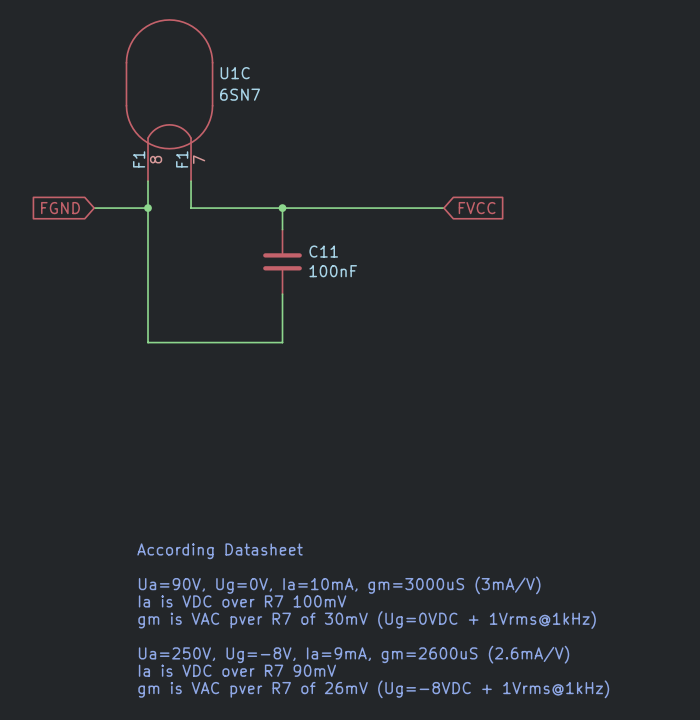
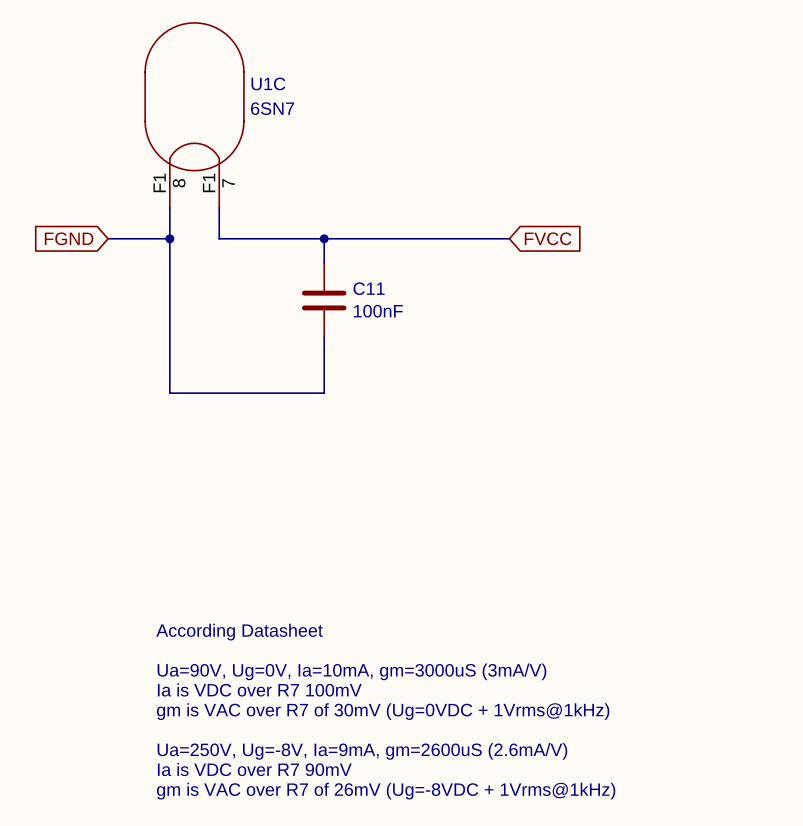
text: gm is VAC pver R7 of 30mV (Ug=0VDC + 1Vrms@1kHz) (367, 620) -> gm is VAC over R7 of 30mV (Ug=0VDC + 1Vrms@1kHz) (383, 711)
text: gm is VAC pver R7 of 26mV (Ug=-8VDC + 1Vrms@1kHz) (373, 689) -> gm is VAC over R7 of 26mV (Ug=-8VDC + 1Vrms@1kHz) (386, 791)

